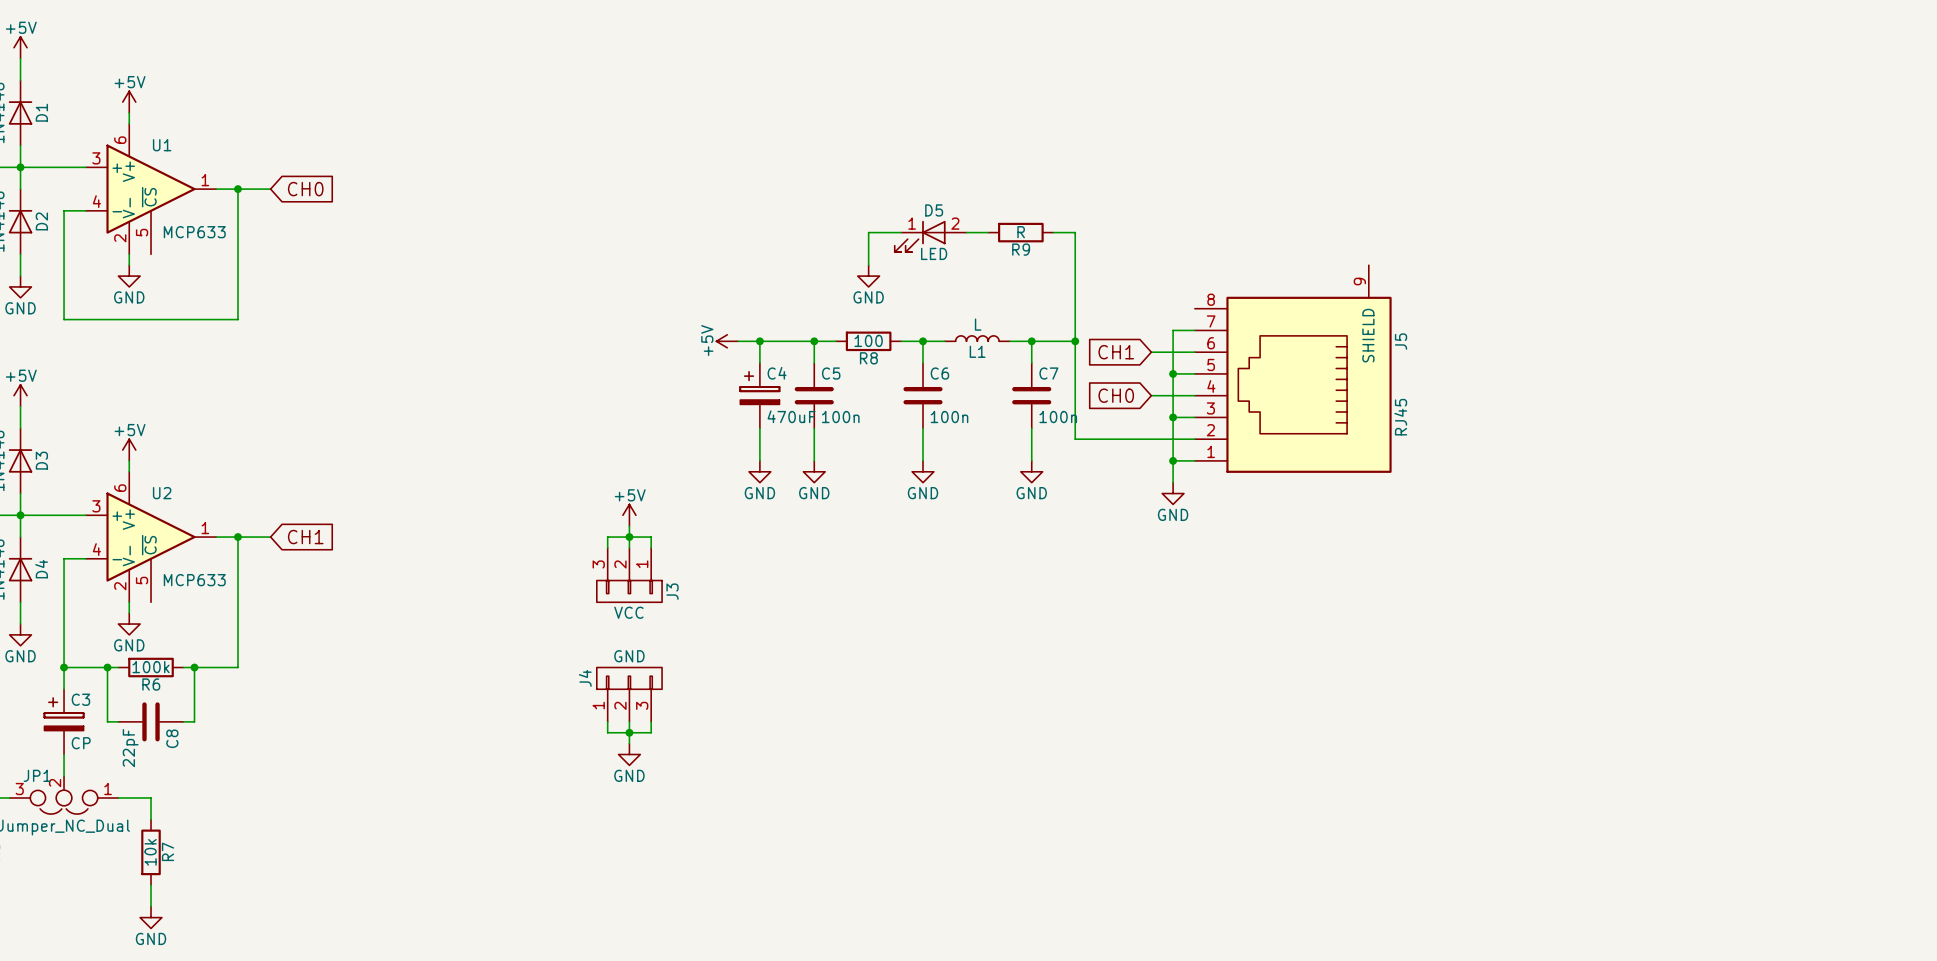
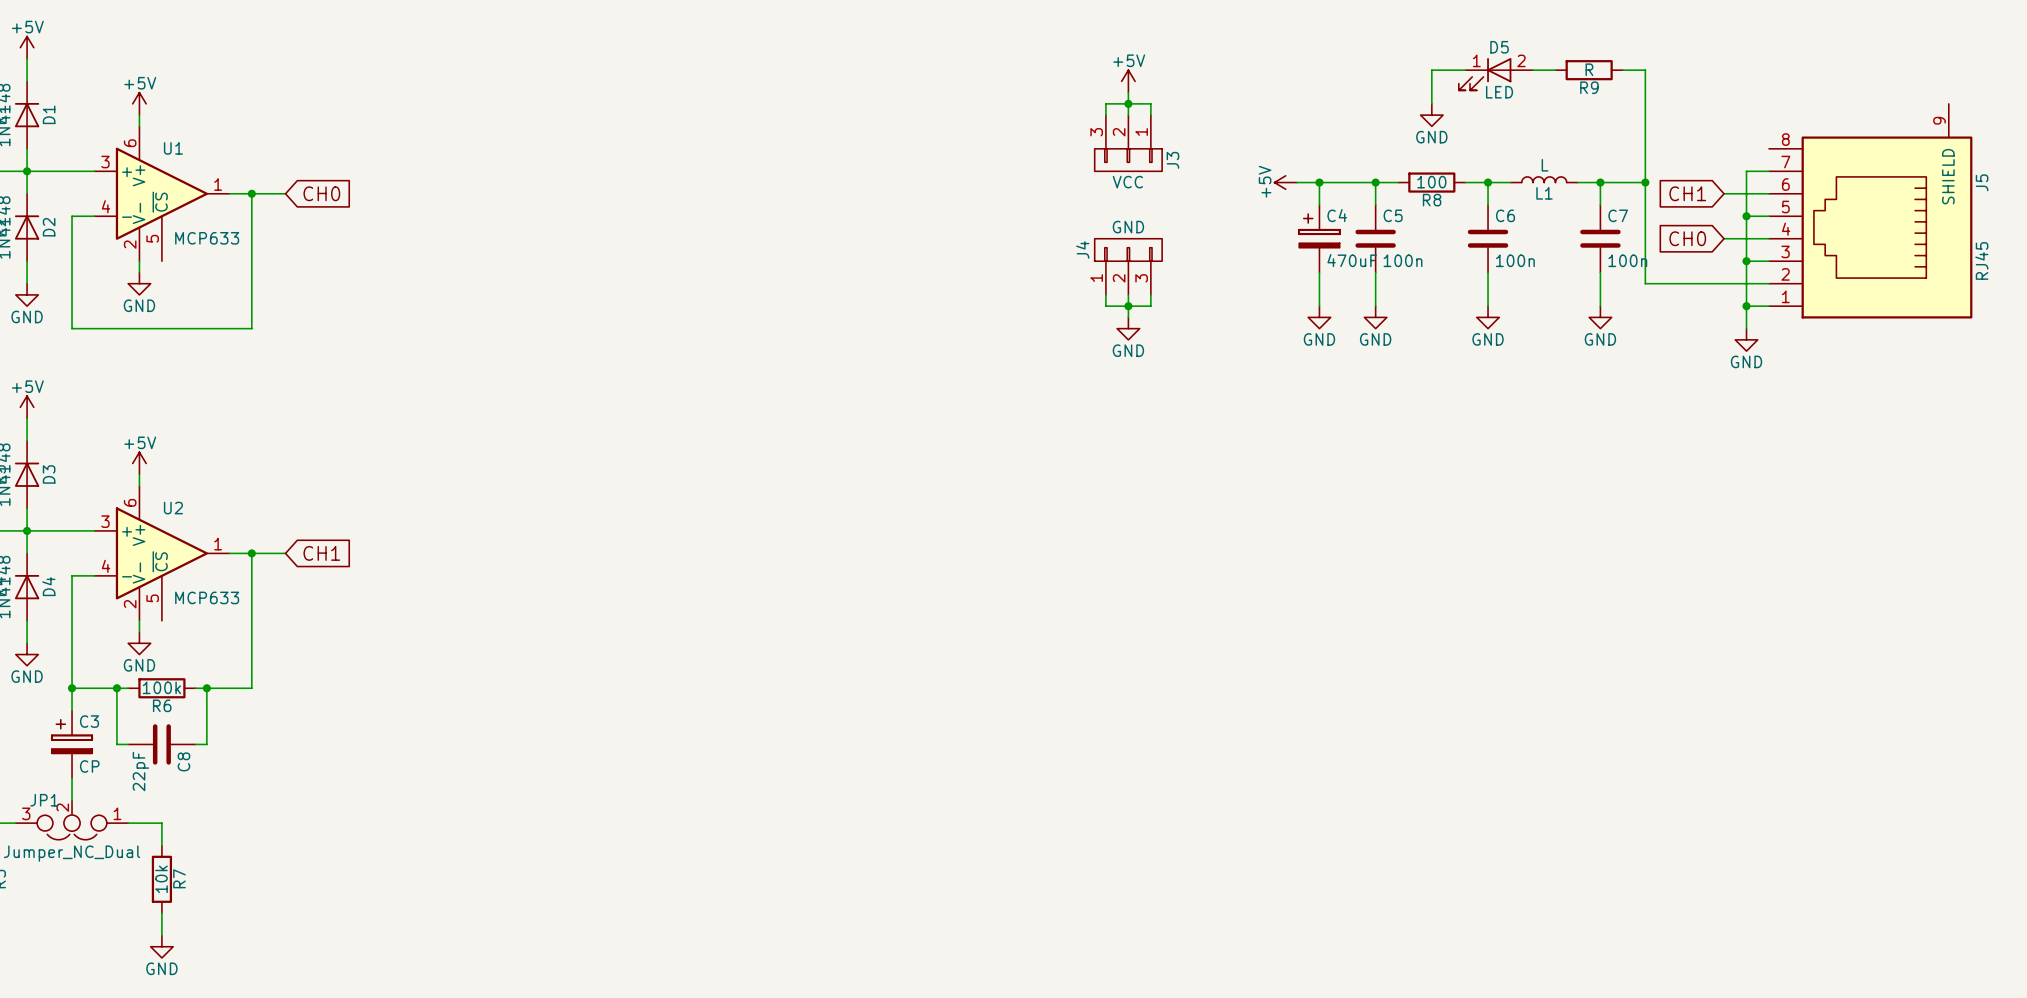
wire: none -> (1465, 70) (1431, 70) (1431, 103)
wire: none -> (1532, 70) (1555, 70)
wire: none -> (1622, 70) (1645, 70) (1645, 283) (1768, 283)
power symbol: none -> +5V (1128, 81)
wire: none -> (1128, 92) (1128, 115)
junction: none -> (1128, 103)
wire: none -> (1105, 115) (1105, 103) (1150, 103) (1150, 115)
power symbol: none -> GND (1431, 115)
wire: none -> (1768, 171) (1746, 171) (1746, 328)
power symbol: none -> +5V (1285, 182)
wire: none -> (1296, 182) (1398, 182)
wire: none -> (1319, 182) (1319, 205)
junction: none -> (1319, 182)
wire: none -> (1375, 182) (1375, 205)
junction: none -> (1375, 182)
wire: none -> (1465, 182) (1510, 182)
wire: none -> (1488, 182) (1488, 205)
junction: none -> (1488, 182)
wire: none -> (1577, 182) (1645, 182)
wire: none -> (1600, 182) (1600, 205)
junction: none -> (1600, 182)
junction: none -> (1645, 182)
global label: none -> CH1 (1687, 193)
wire: none -> (1724, 193) (1768, 193)
wire: none -> (1746, 216) (1768, 216)
junction: none -> (1746, 216)
wire: (901, 232) (868, 232) (868, 265) -> none
wire: (966, 232) (988, 232) -> none
R9 position: (1020, 232) -> (1589, 70)
wire: (1053, 232) (1075, 232) (1075, 439) (1194, 439) -> none
global label: none -> CH0 (1687, 238)
wire: none -> (1724, 238) (1768, 238)
D5 position: (930, 236) -> (1495, 74)
wire: none -> (1746, 261) (1768, 261)
junction: none -> (1746, 261)
wire: none -> (1319, 272) (1319, 306)
wire: none -> (1375, 272) (1375, 306)
wire: none -> (1488, 272) (1488, 306)
wire: none -> (1600, 272) (1600, 306)
power symbol: GND (868, 276) -> none
wire: none -> (1105, 294) (1105, 306) (1150, 306) (1150, 294)
junction: none -> (1128, 306)
wire: none -> (1746, 306) (1768, 306)
junction: none -> (1746, 306)
power symbol: none -> GND (1319, 317)
power symbol: none -> GND (1375, 317)
power symbol: none -> GND (1488, 317)
power symbol: none -> GND (1600, 317)
power symbol: none -> GND (1128, 328)
wire: (1194, 330) (1173, 330) (1173, 482) -> none
power symbol: none -> GND (1746, 339)
L1 position: (977, 338) -> (1544, 179)
power symbol: +5V (727, 341) -> none
wire: (738, 341) (836, 341) -> none
wire: (759, 341) (759, 363) -> none
junction: (759, 341) -> none
wire: (814, 341) (814, 363) -> none
junction: (814, 341) -> none
R8 position: (868, 341) -> (1431, 182)
wire: (901, 341) (944, 341) -> none
wire: (923, 341) (923, 363) -> none
junction: (923, 341) -> none
wire: (1009, 341) (1075, 341) -> none
wire: (1031, 341) (1031, 363) -> (1128, 294) (1128, 317)
junction: (1031, 341) -> none
junction: (1075, 341) -> none
global label: CH1 (1116, 352) -> none
wire: (1151, 352) (1194, 352) -> none
J5 position: (1293, 369) -> (1870, 211)
wire: (1173, 373) (1194, 373) -> none
junction: (1173, 373) -> none
C4 position: (759, 395) -> (1319, 238)
C5 position: (814, 395) -> (1375, 238)
C6 position: (923, 395) -> (1488, 238)
C7 position: (1031, 395) -> (1600, 238)
global label: CH0 (1116, 395) -> none
wire: (1151, 395) (1194, 395) -> none
wire: (1173, 417) (1194, 417) -> none
junction: (1173, 417) -> none
wire: (759, 428) (759, 460) -> none
wire: (814, 428) (814, 460) -> none
wire: (923, 428) (923, 460) -> none
wire: (1031, 428) (1031, 460) -> none
wire: (1173, 460) (1194, 460) -> none
junction: (1173, 460) -> none
power symbol: GND (759, 471) -> none
power symbol: GND (814, 471) -> none
power symbol: GND (923, 471) -> none
power symbol: GND (1031, 471) -> none
power symbol: GND (1173, 493) -> none
power symbol: +5V (629, 515) -> none
wire: (629, 526) (629, 547) -> none
junction: (629, 537) -> none
wire: (607, 547) (607, 537) (651, 537) (651, 547) -> none
J3 position: (629, 575) -> (1128, 143)
J4 position: (629, 694) -> (1128, 266)
wire: (607, 721) (607, 732) (651, 732) (651, 721) -> none
wire: (629, 721) (629, 743) -> none
junction: (629, 732) -> none
power symbol: GND (629, 754) -> none

